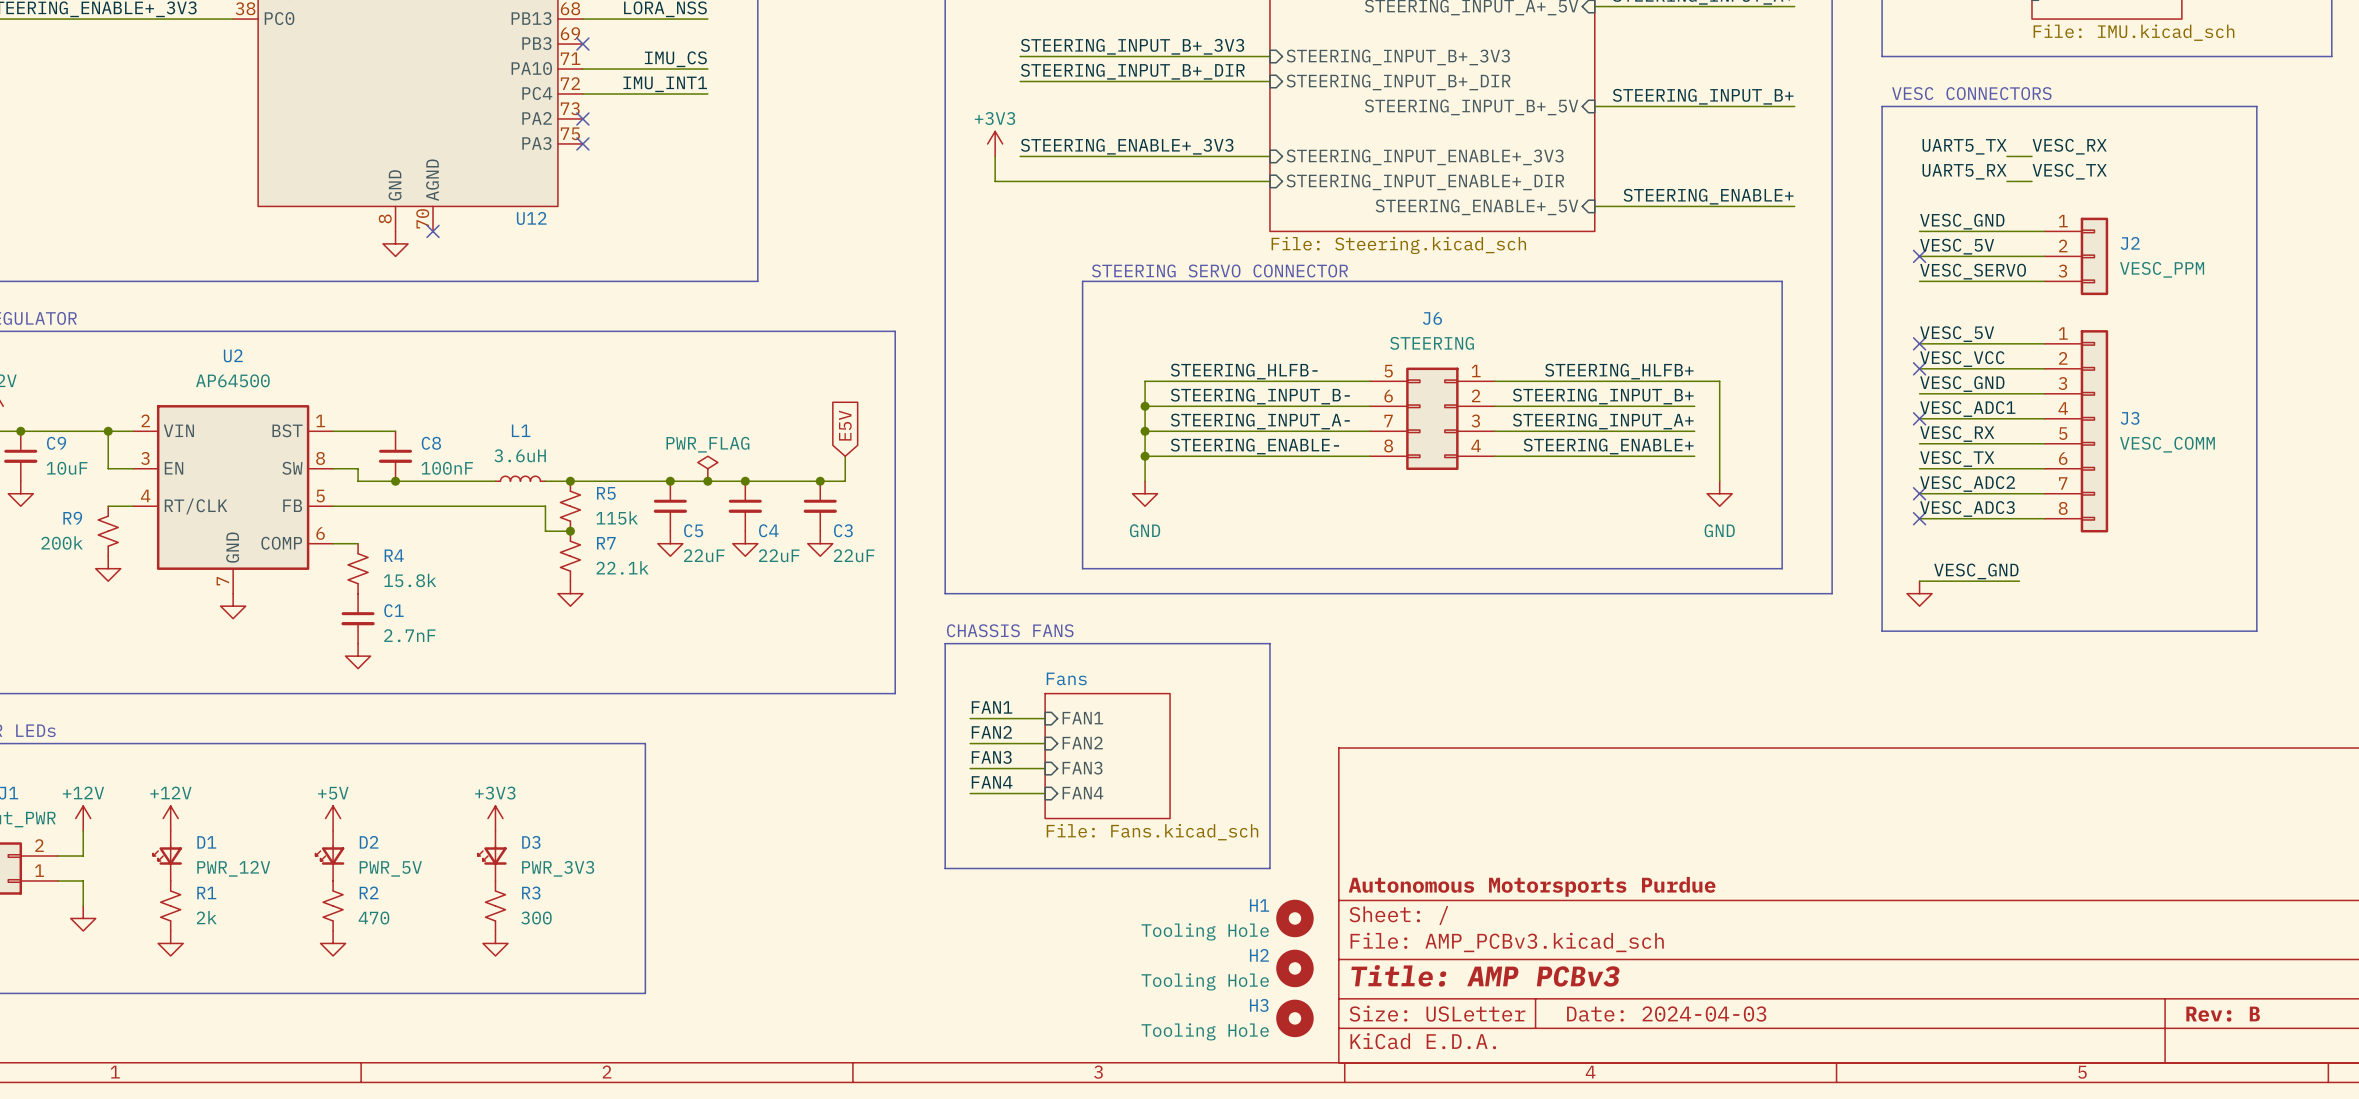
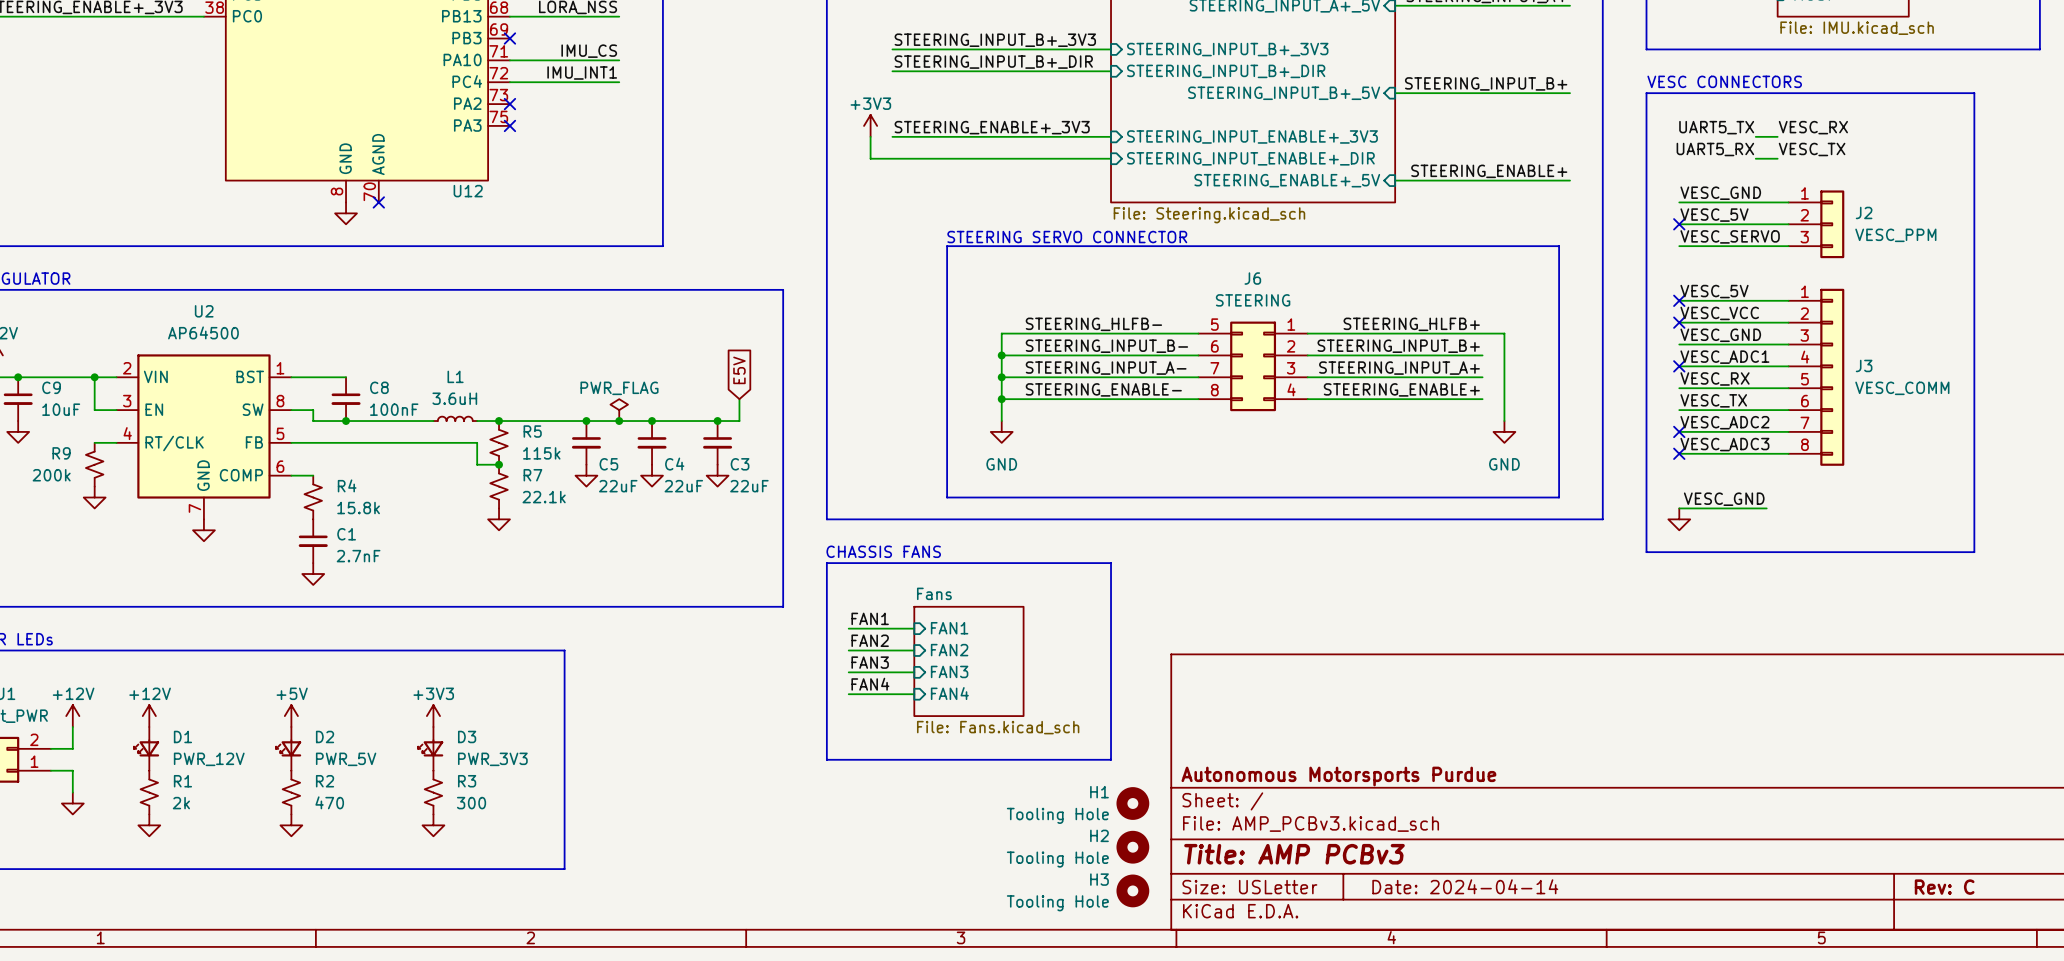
title block: Date: 2024-04-03 (1666, 1014) -> Date: 2024-04-14 (1465, 886)
title block: Rev: B (2223, 1014) -> Rev: C (1944, 887)

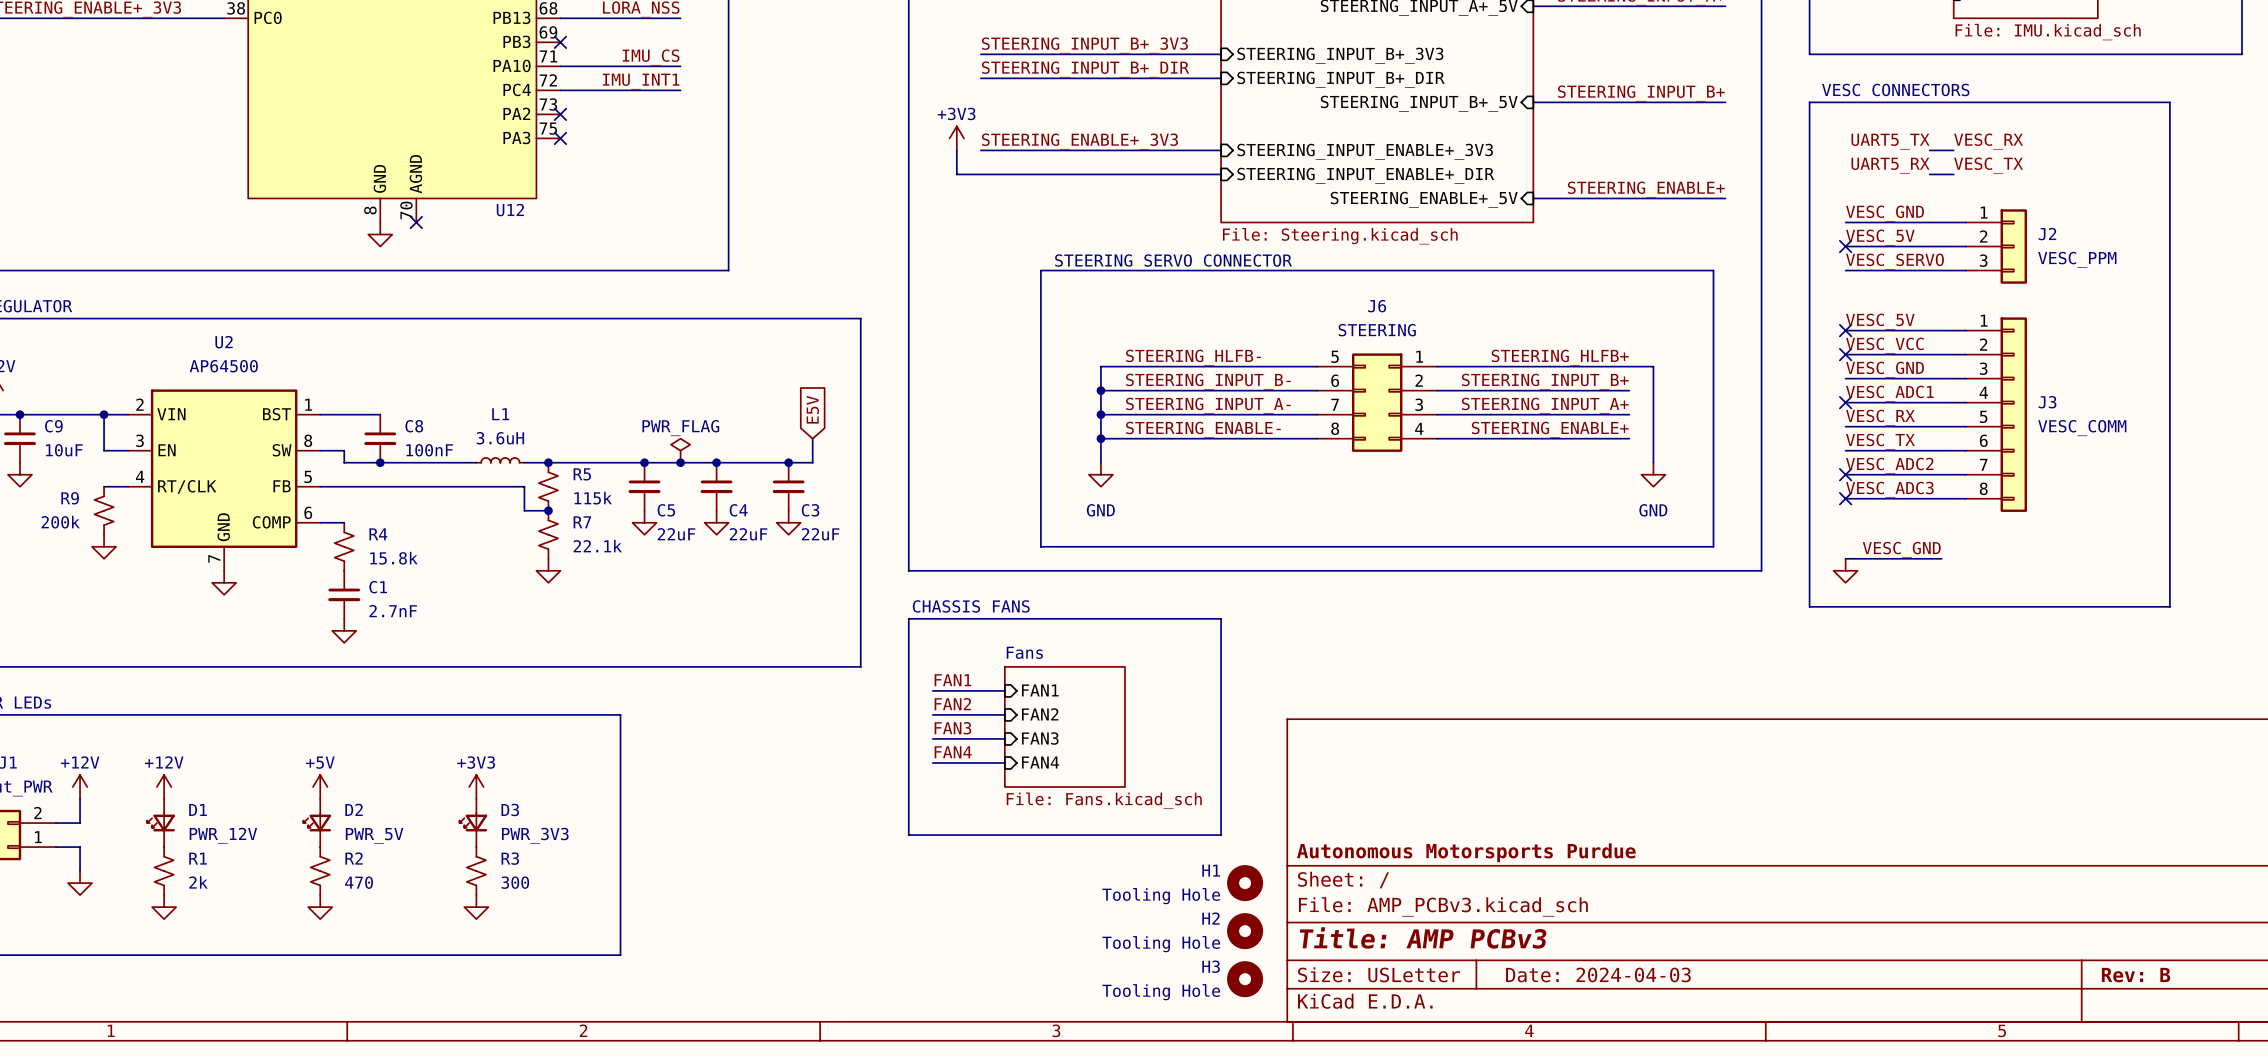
title block: Date: 2024-04-14 (1465, 886) -> Date: 2024-04-03 (1598, 974)
title block: Rev: C (1944, 887) -> Rev: B (2136, 975)

